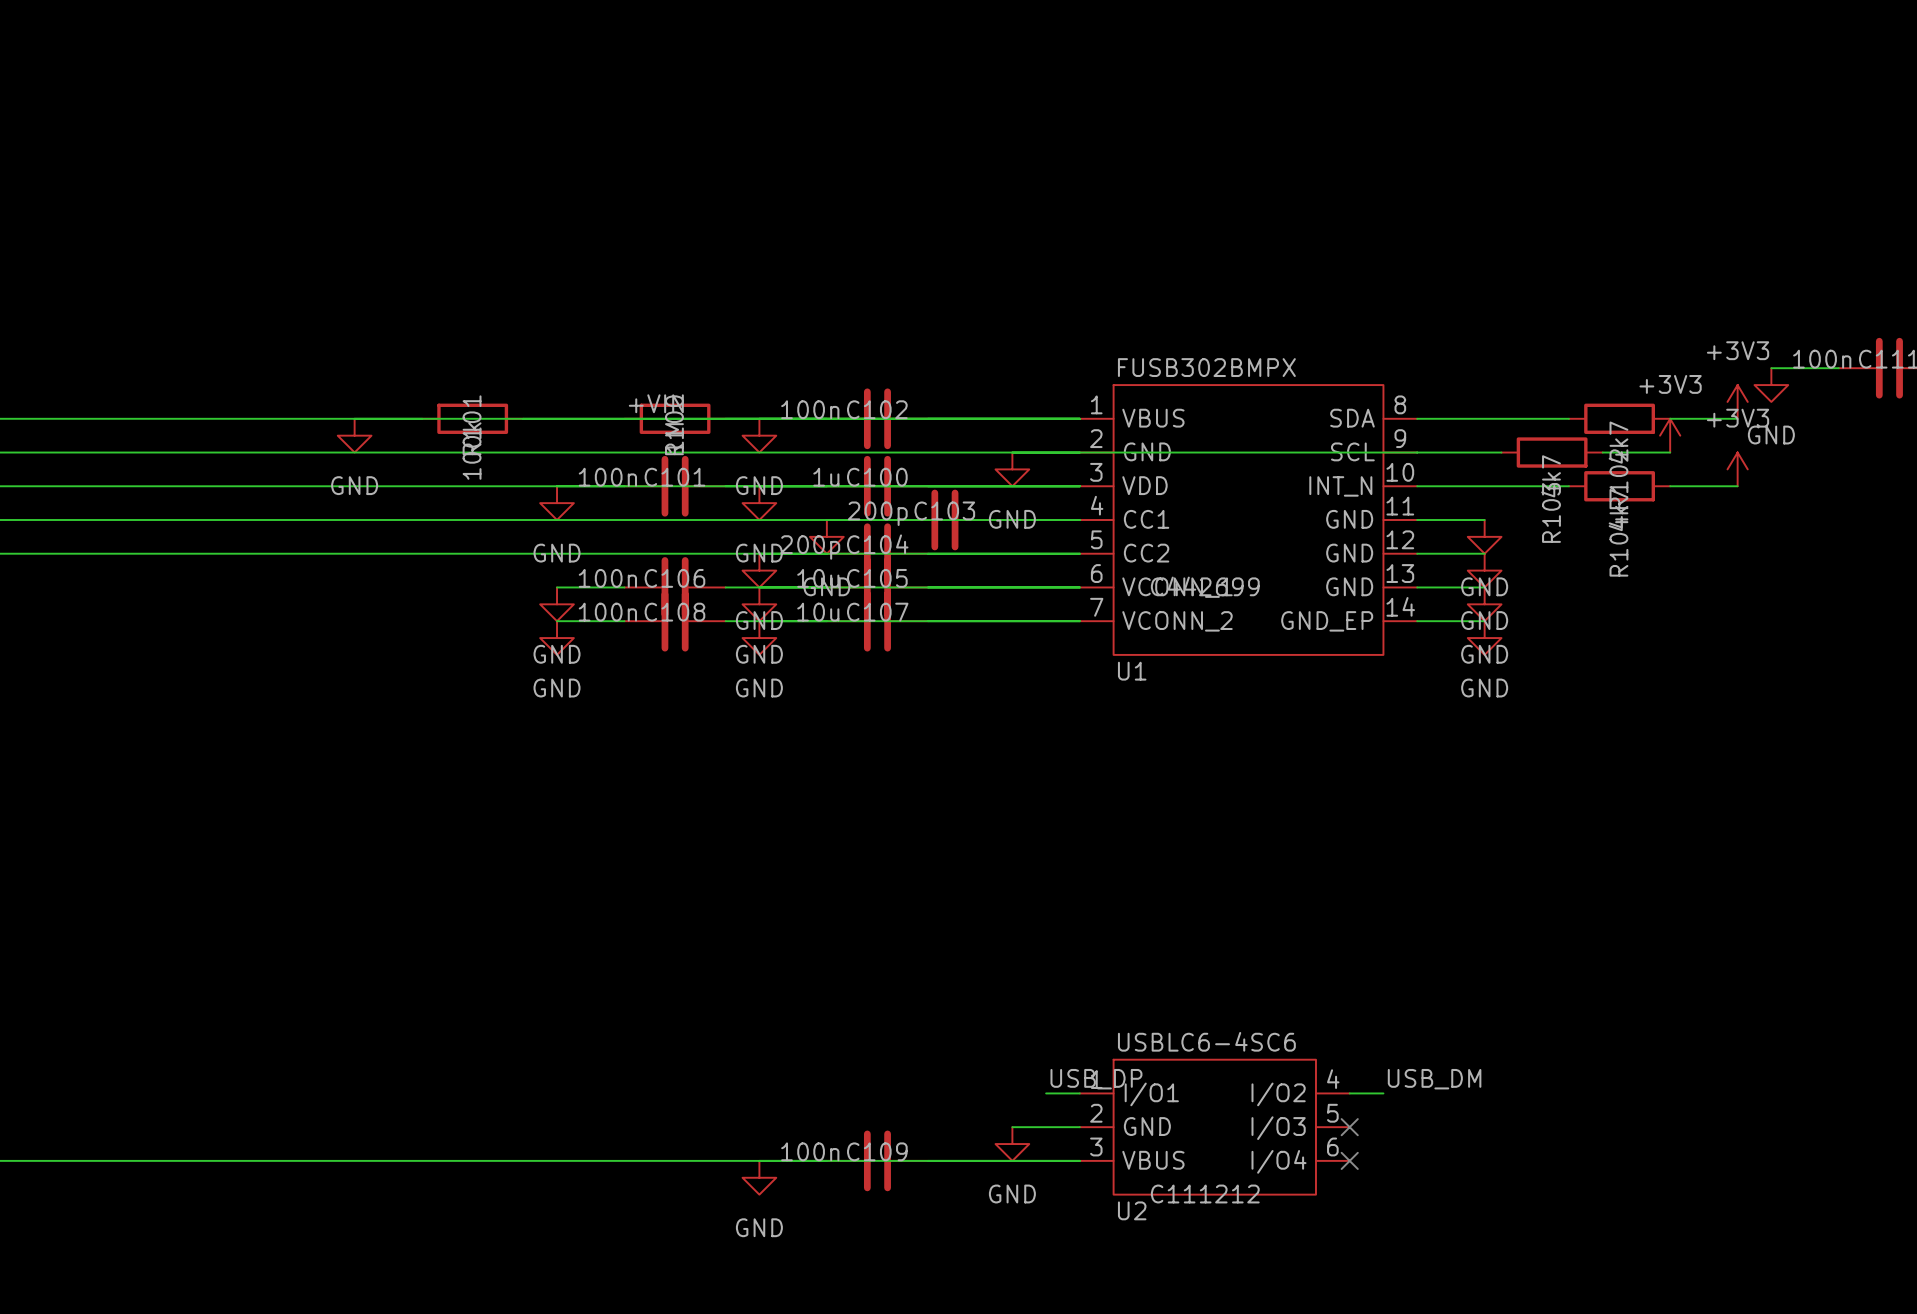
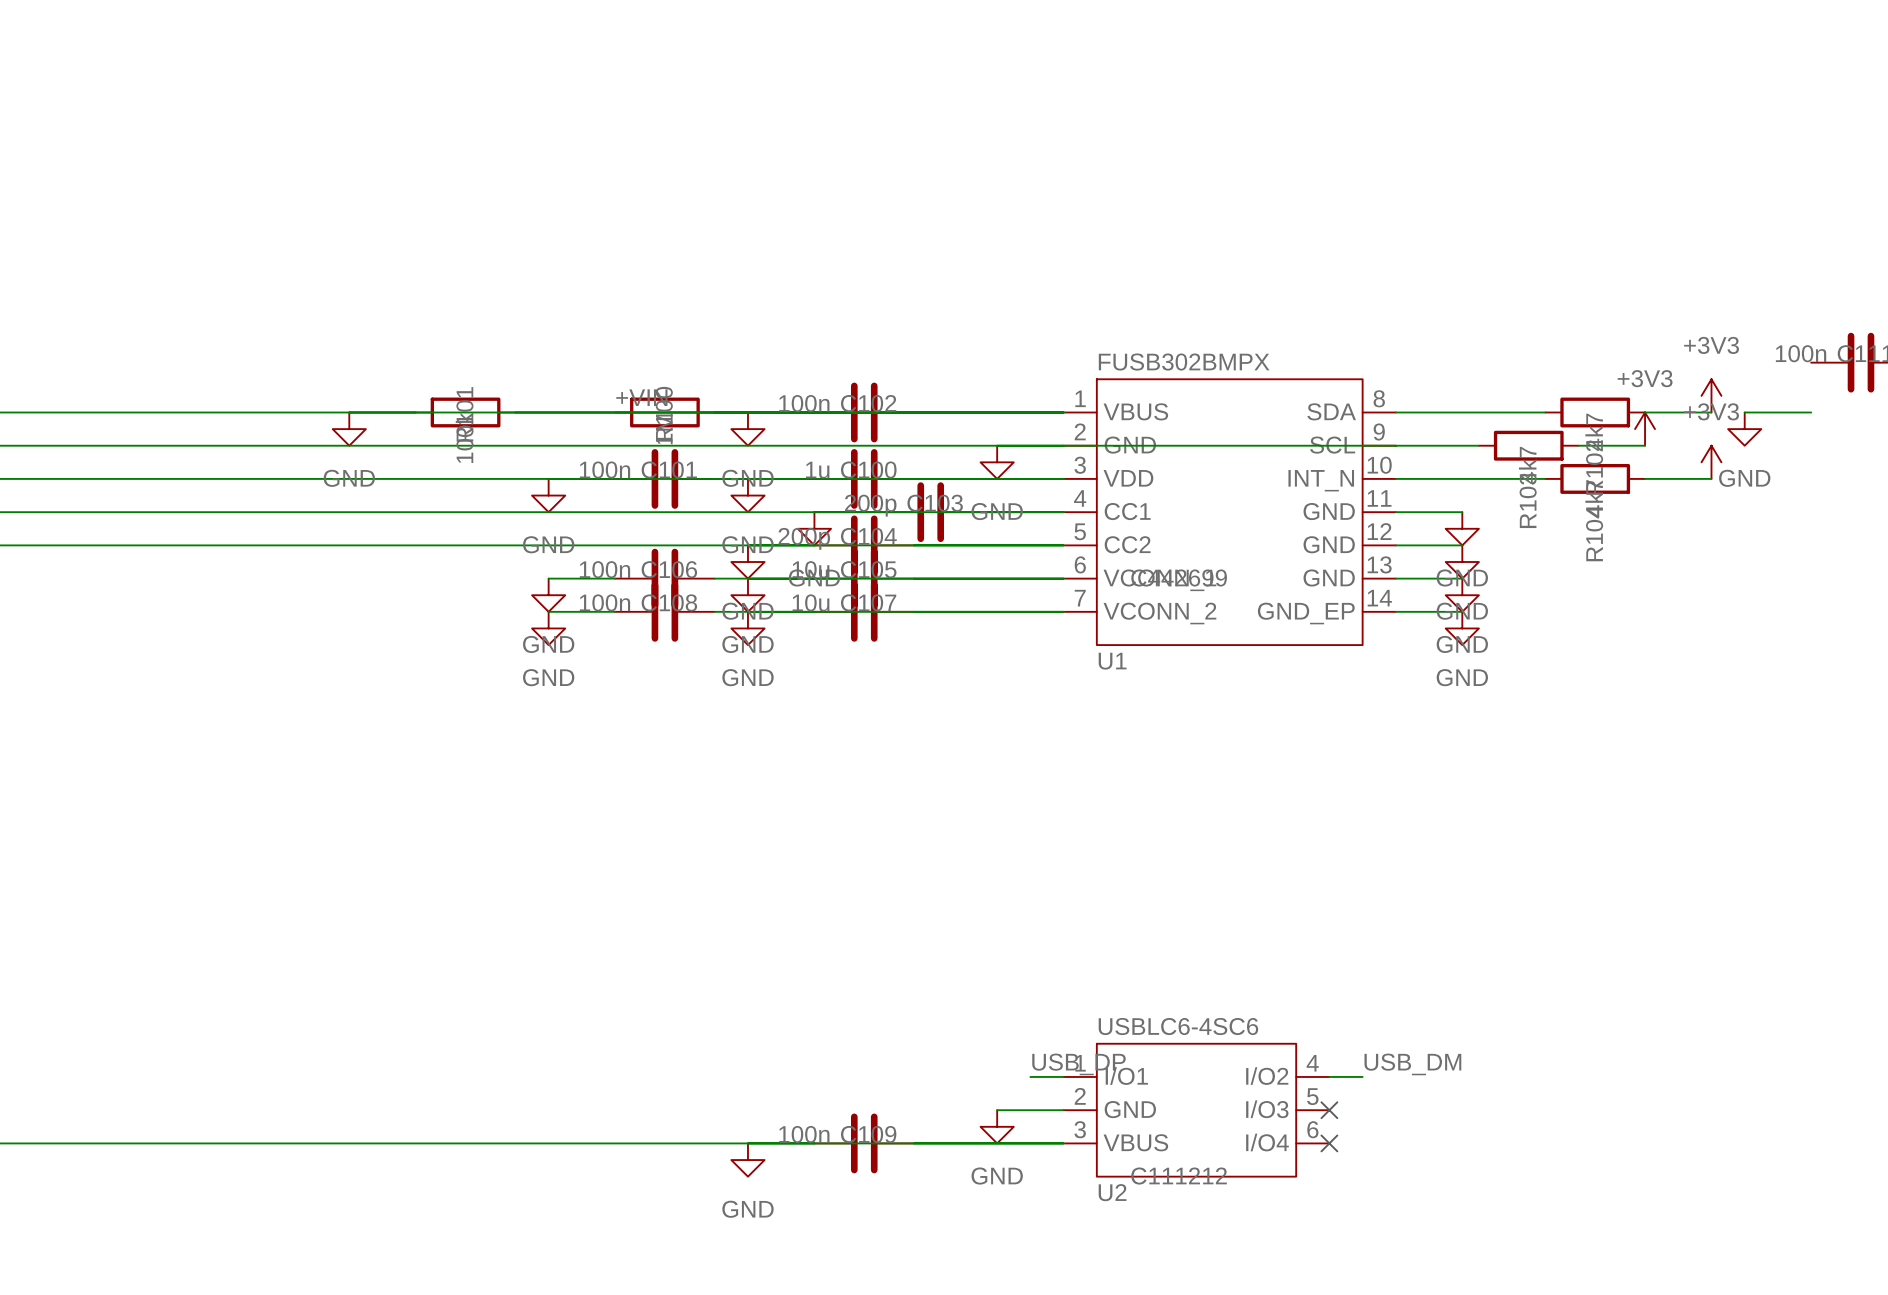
wire: (1771, 368) (1838, 368) -> (1744, 412) (1811, 412)
power symbol position: GND (1771, 385) -> GND (1744, 429)

